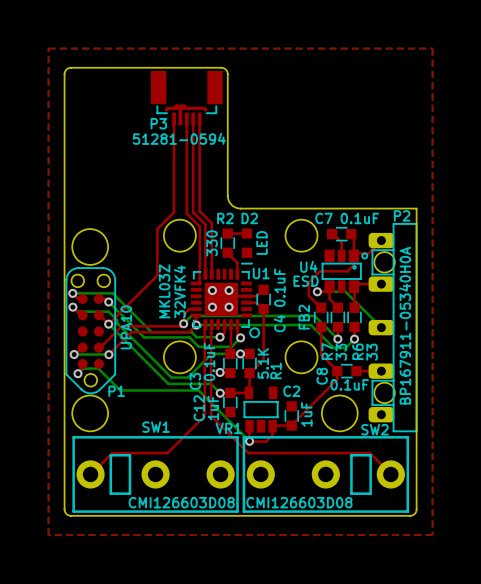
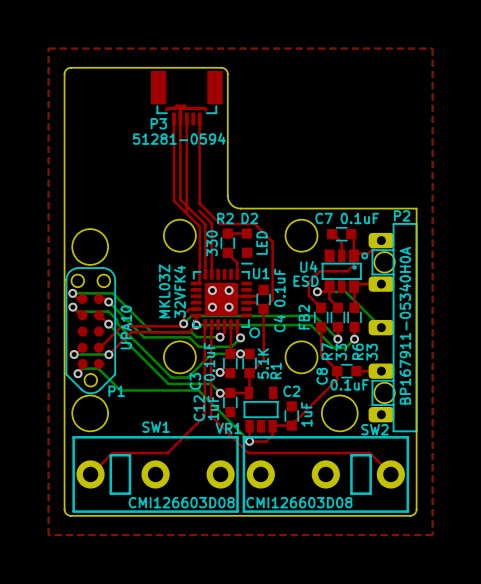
top track: (193, 122) (193, 212) -> (180, 118) (180, 199) (193, 212)
top track: (174, 200) (174, 212) (157, 229) (157, 275) (108, 324) -> (174, 200) (186, 213)
top track: (199, 203) (199, 211) -> (199, 203) (220, 223) (254, 223) (272, 241) (272, 300) (263, 309)

